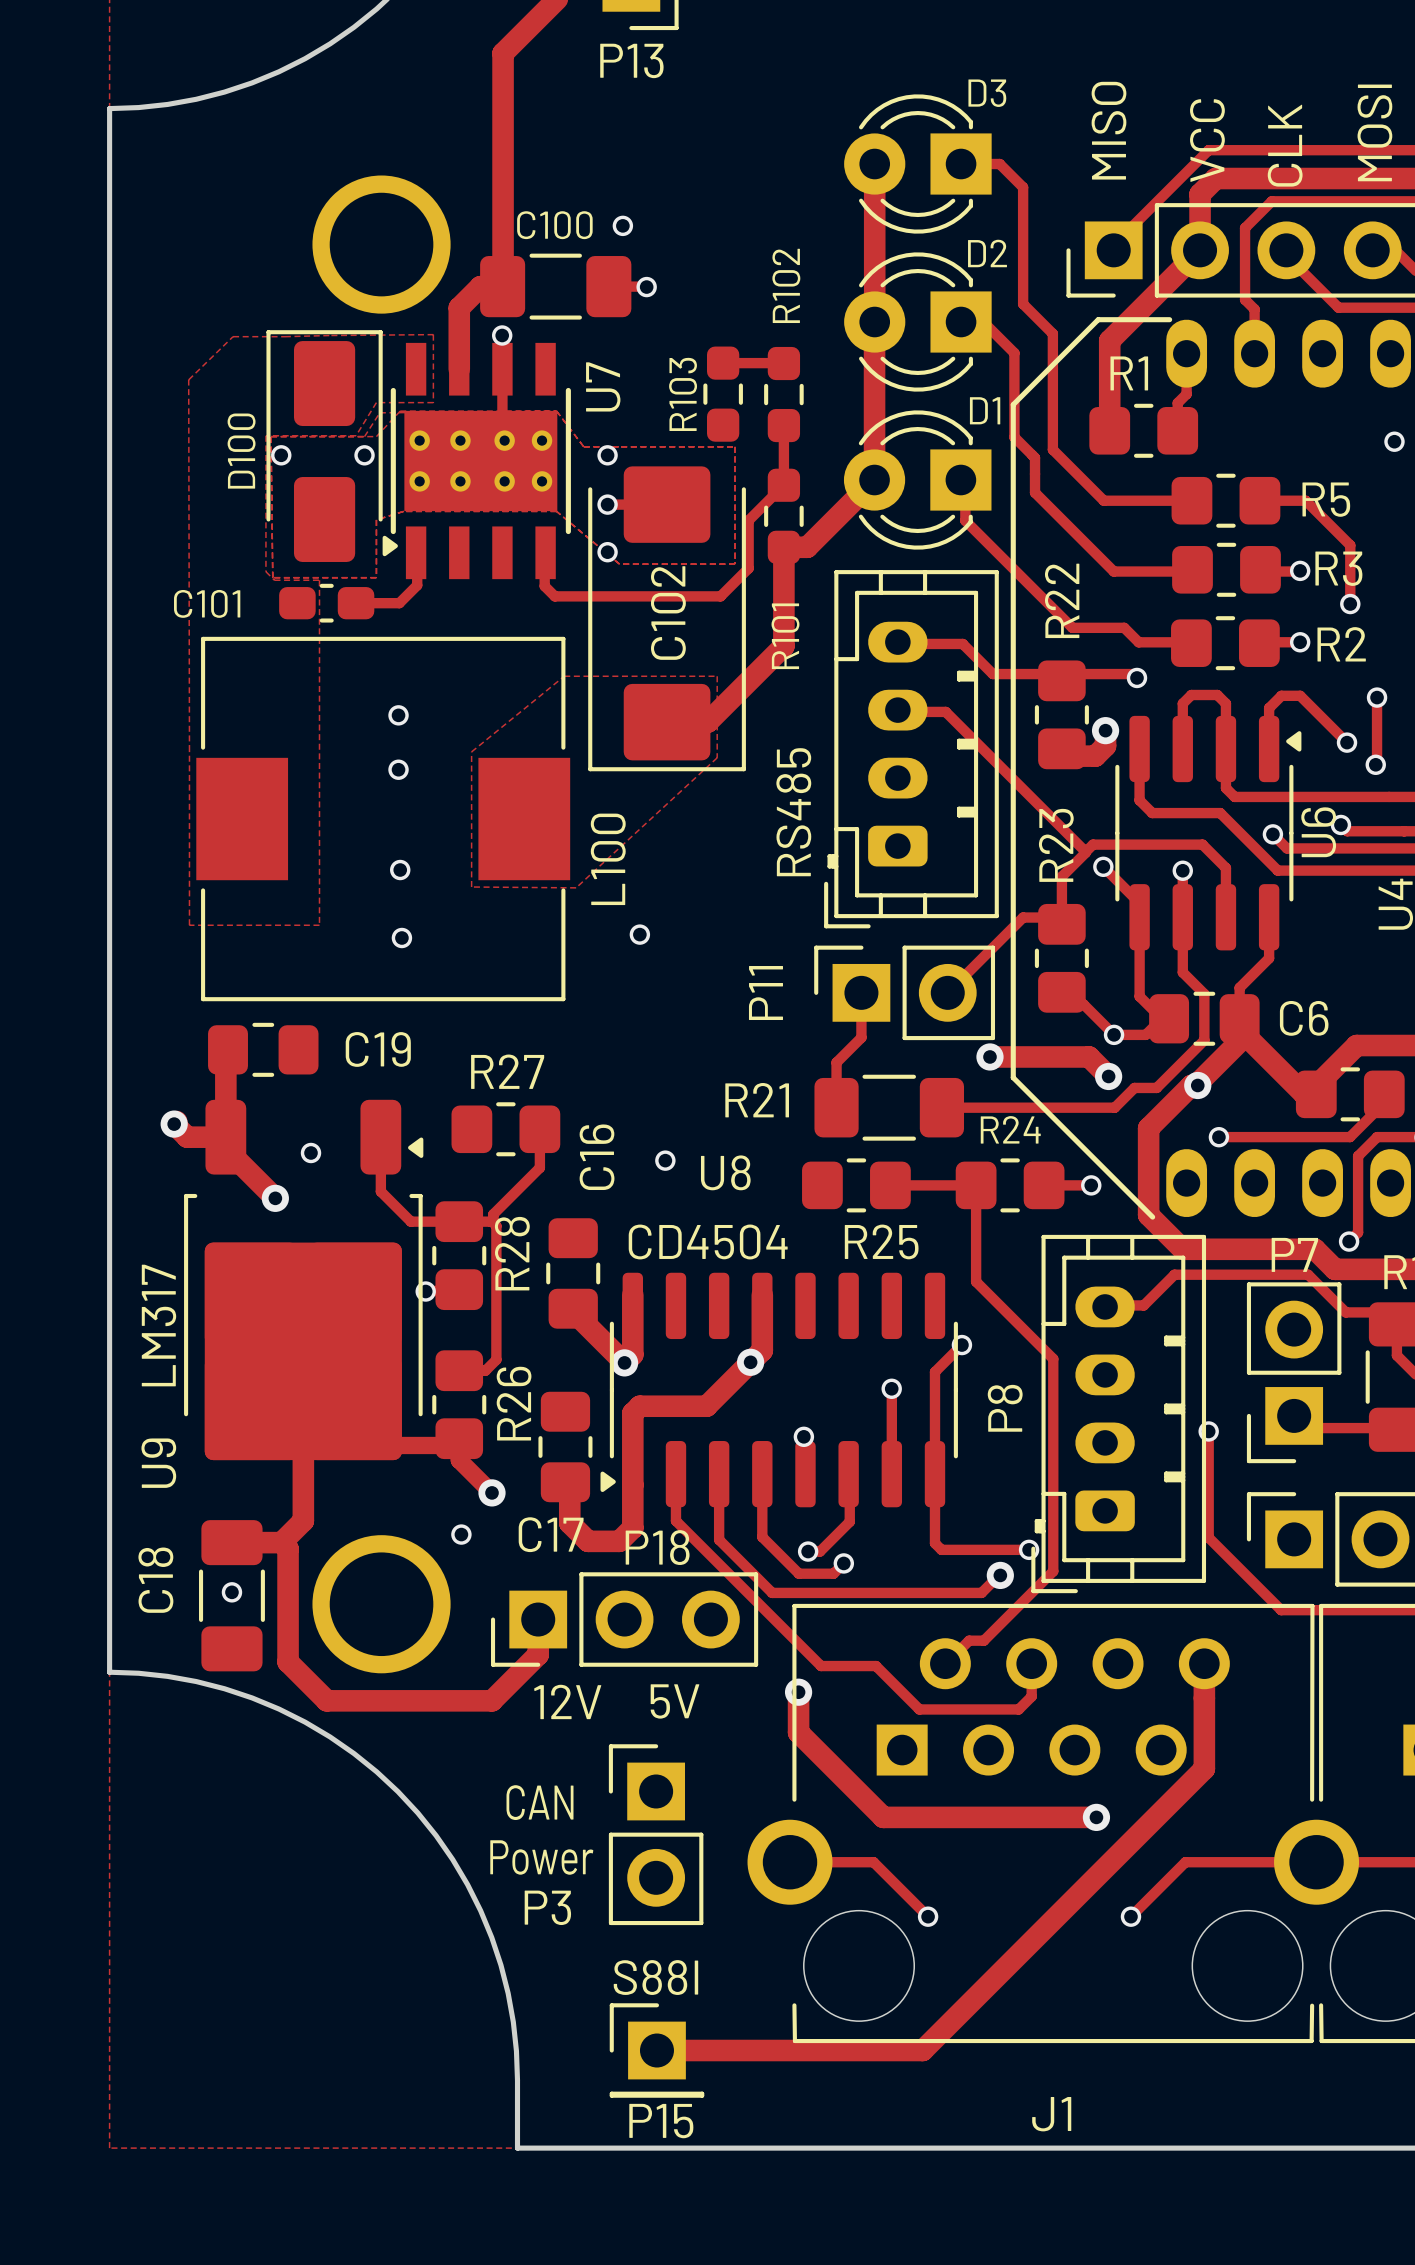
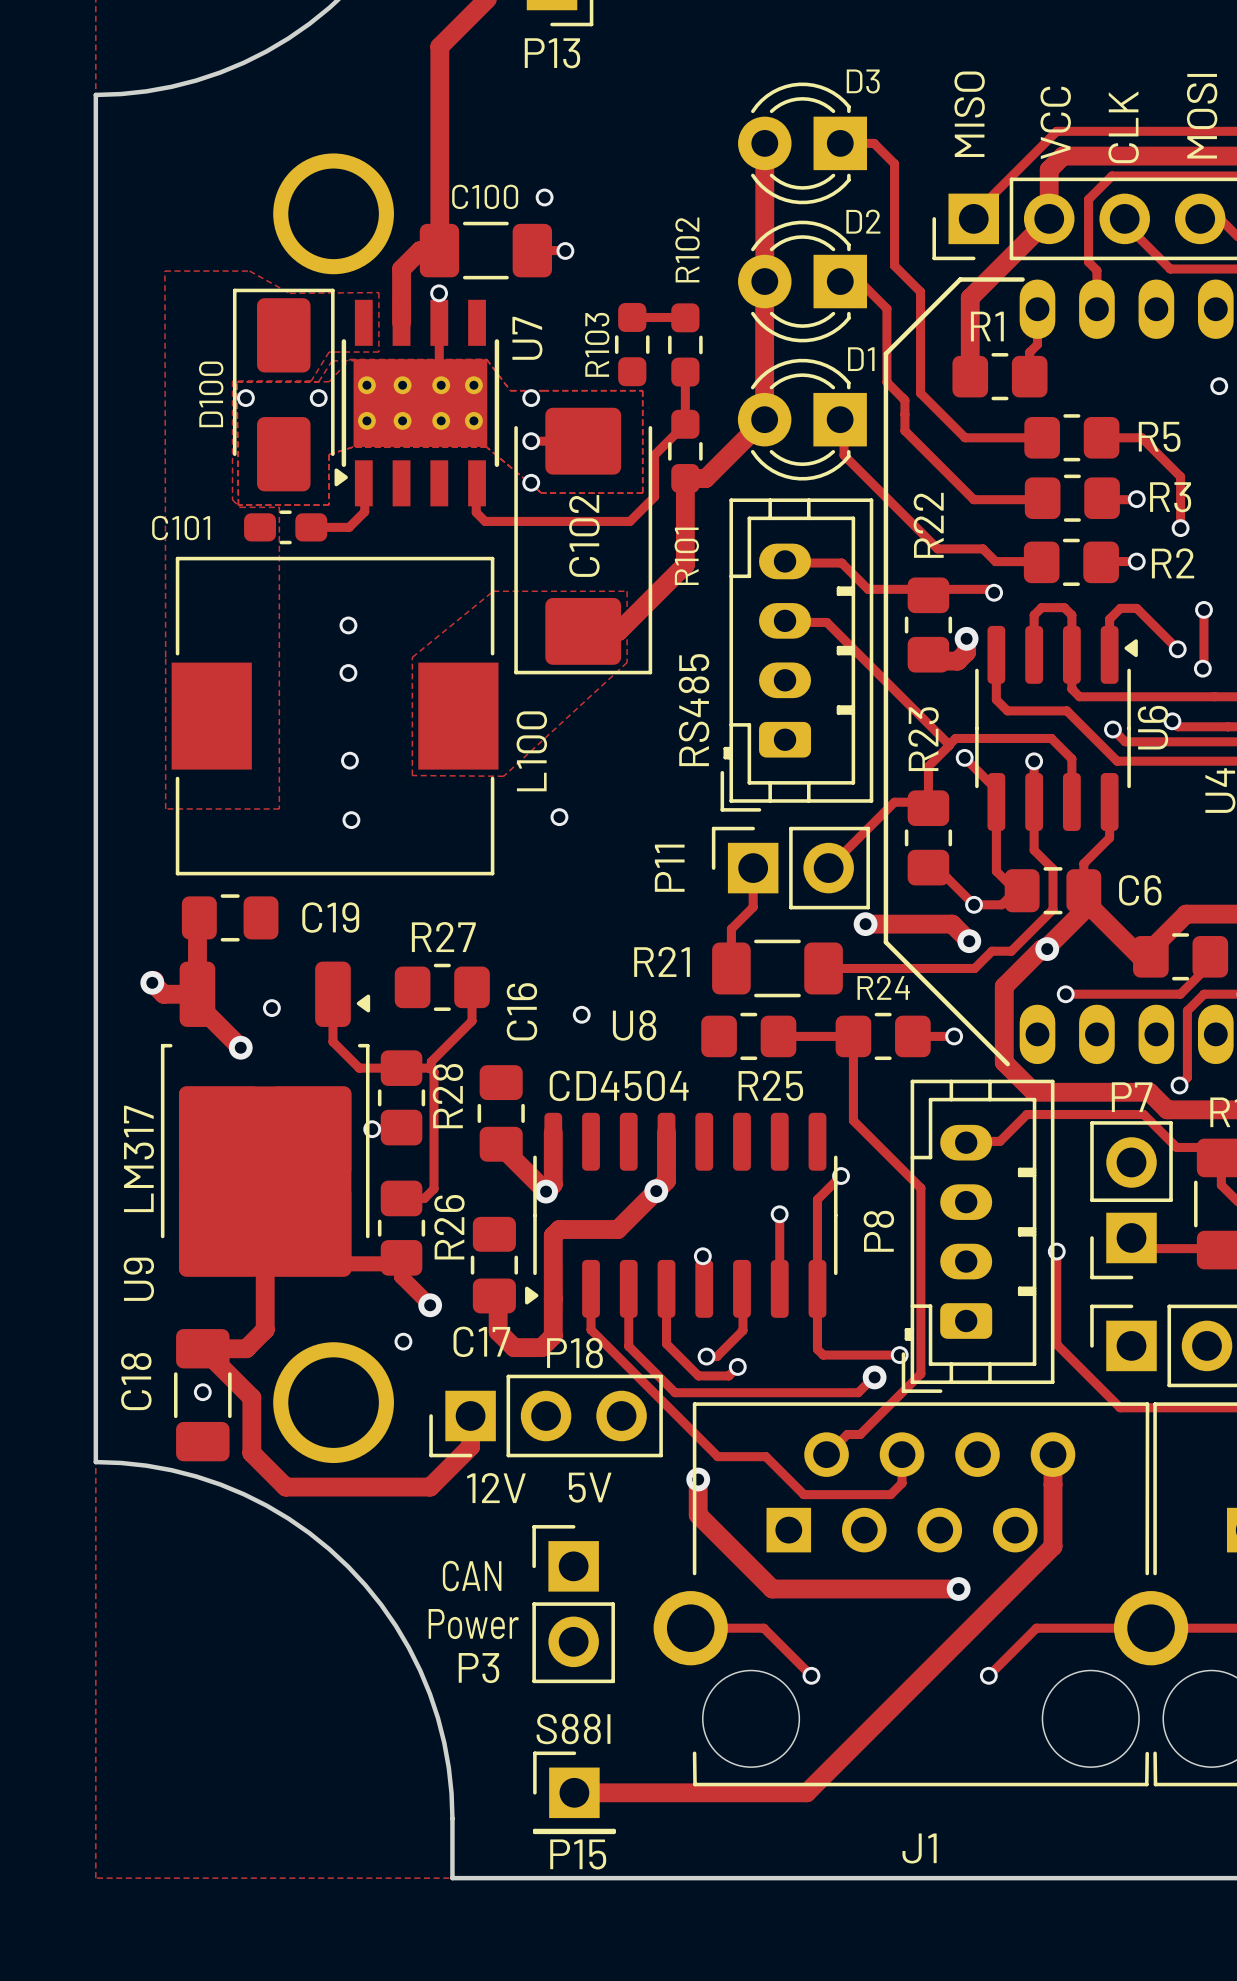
zone outline: (331, 335) (233, 336) (188, 379) (189, 751) -> (289, 293) (249, 271) (164, 271) (165, 656)
track: (281, 1542) (288, 1549) (288, 1598) -> (202, 1348) (251, 1397)

